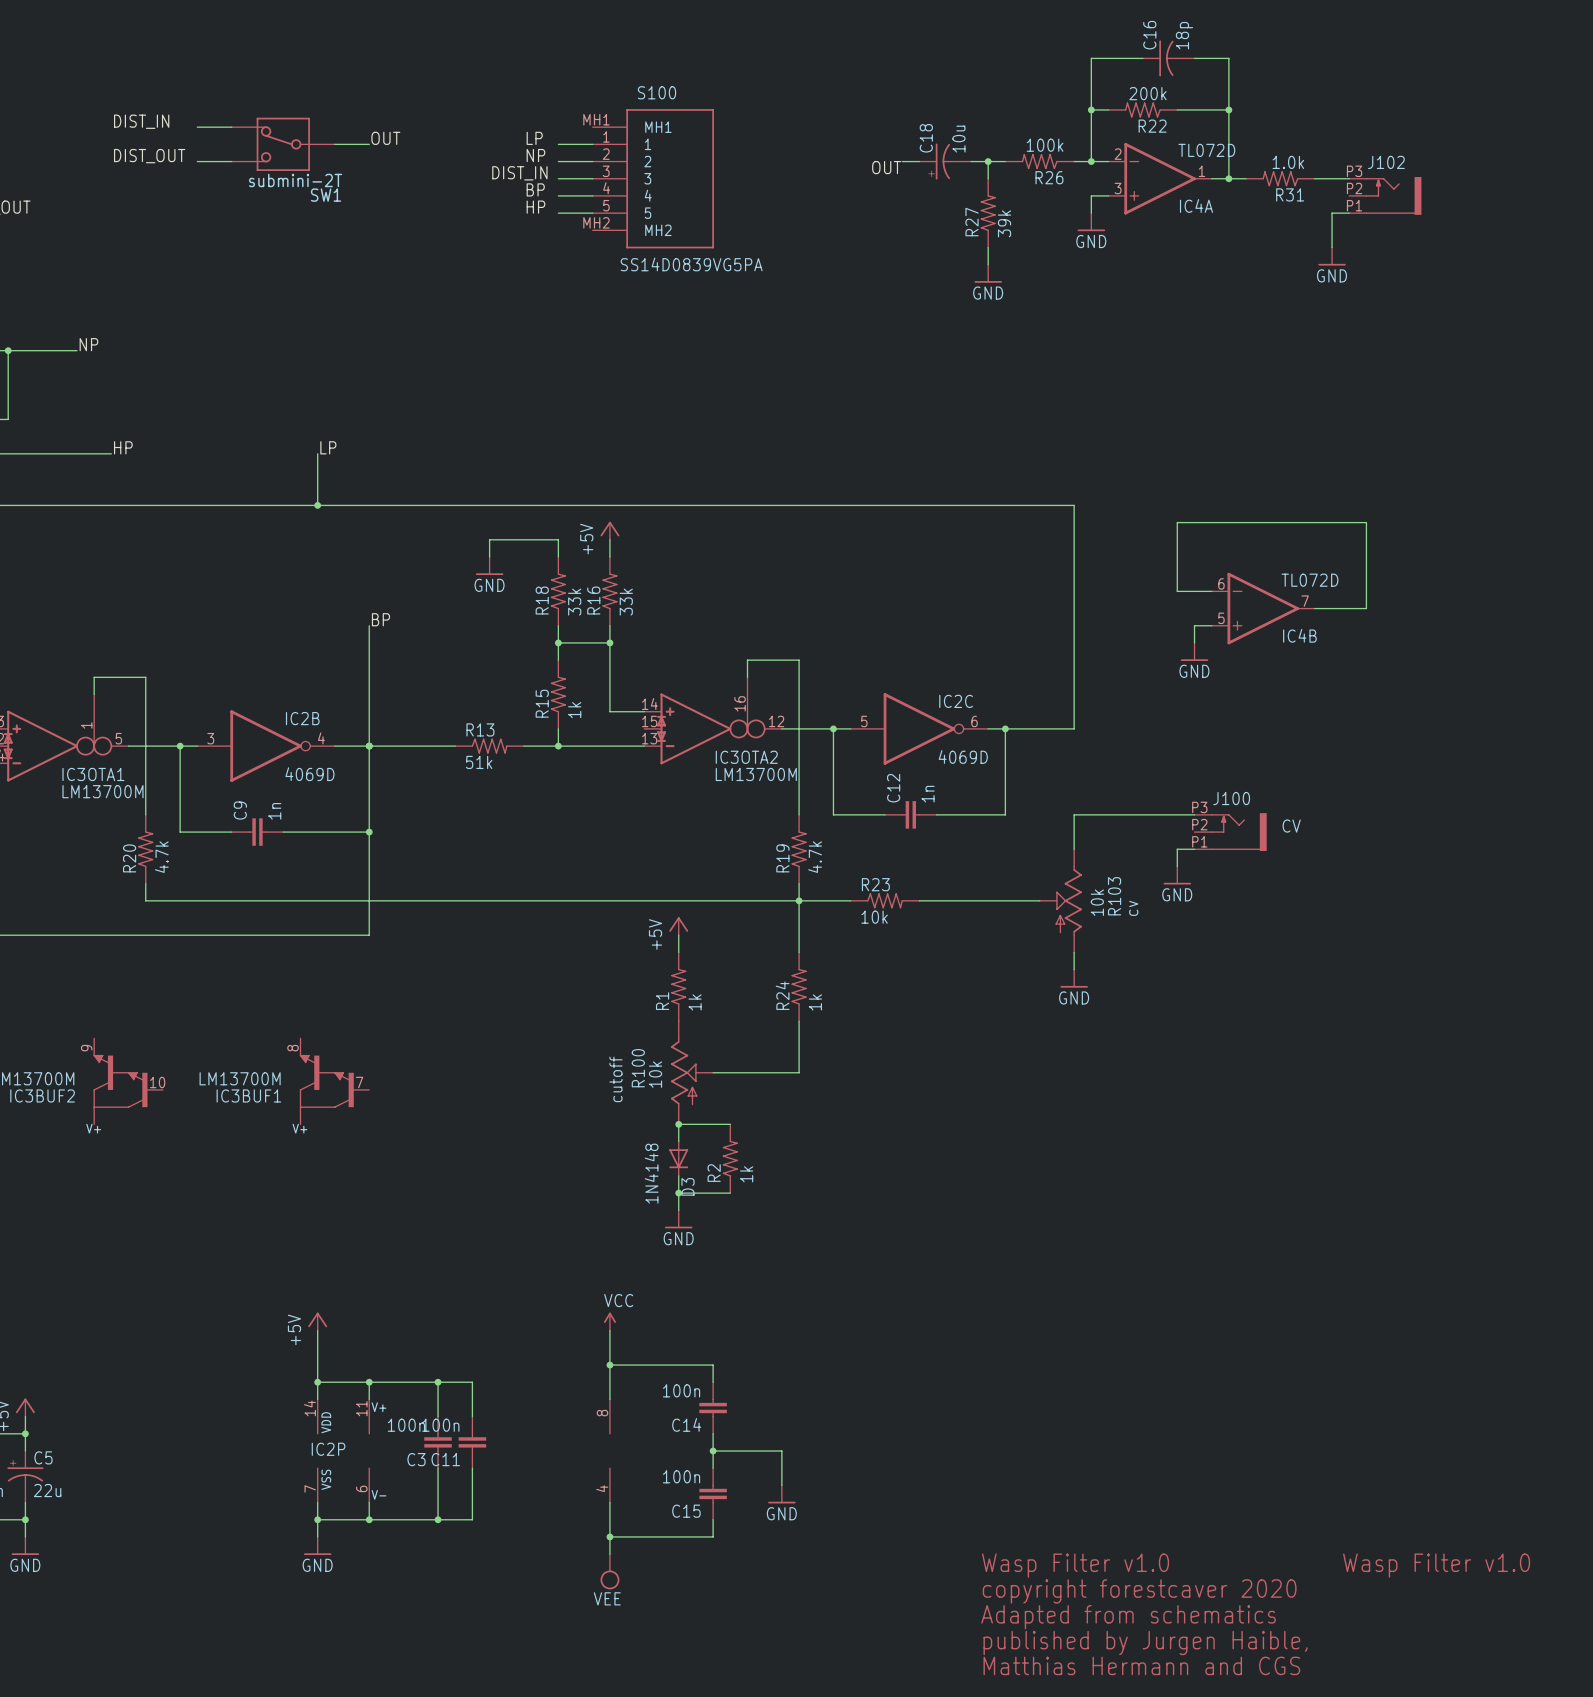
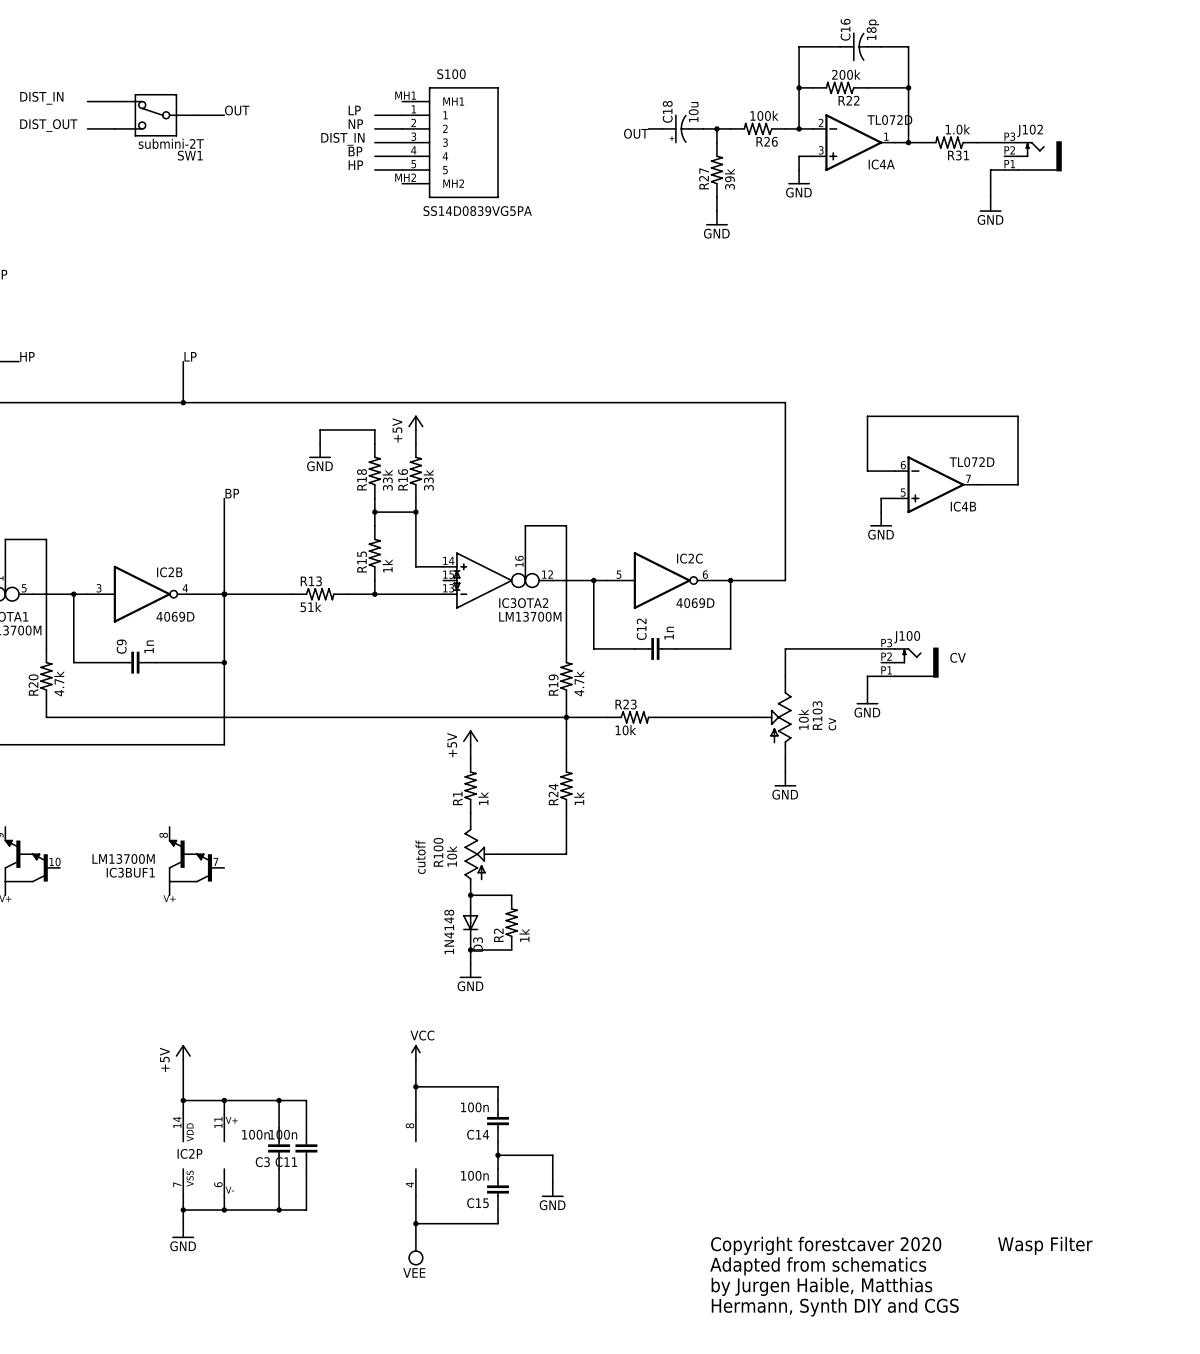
text: Wasp Filter v1.0 (1075, 1565) -> Copyright forestcaver 2020 (826, 1245)
text: Wasp Filter v1.0 (1436, 1565) -> Wasp Filter (1045, 1245)
text: copyright forestcaver 2020 (1139, 1591) -> Adapted from schematics (818, 1266)
text: Adapted from schematics (1128, 1617) -> by Jurgen Haible, Matthias (821, 1286)
text: published by Jurgen Haible, (1145, 1642) -> Hermann, Synth DIY and CGS (835, 1307)
text: Matthias Hermann and CGS (1141, 1665) -> none

